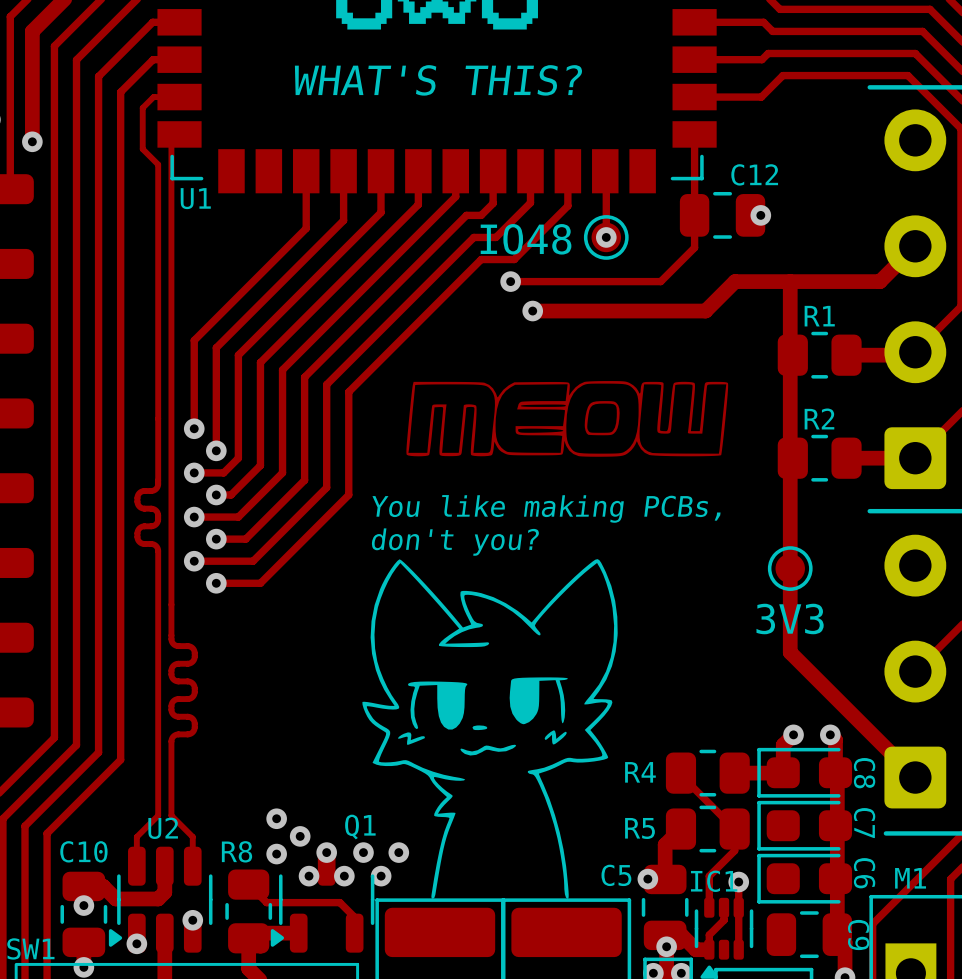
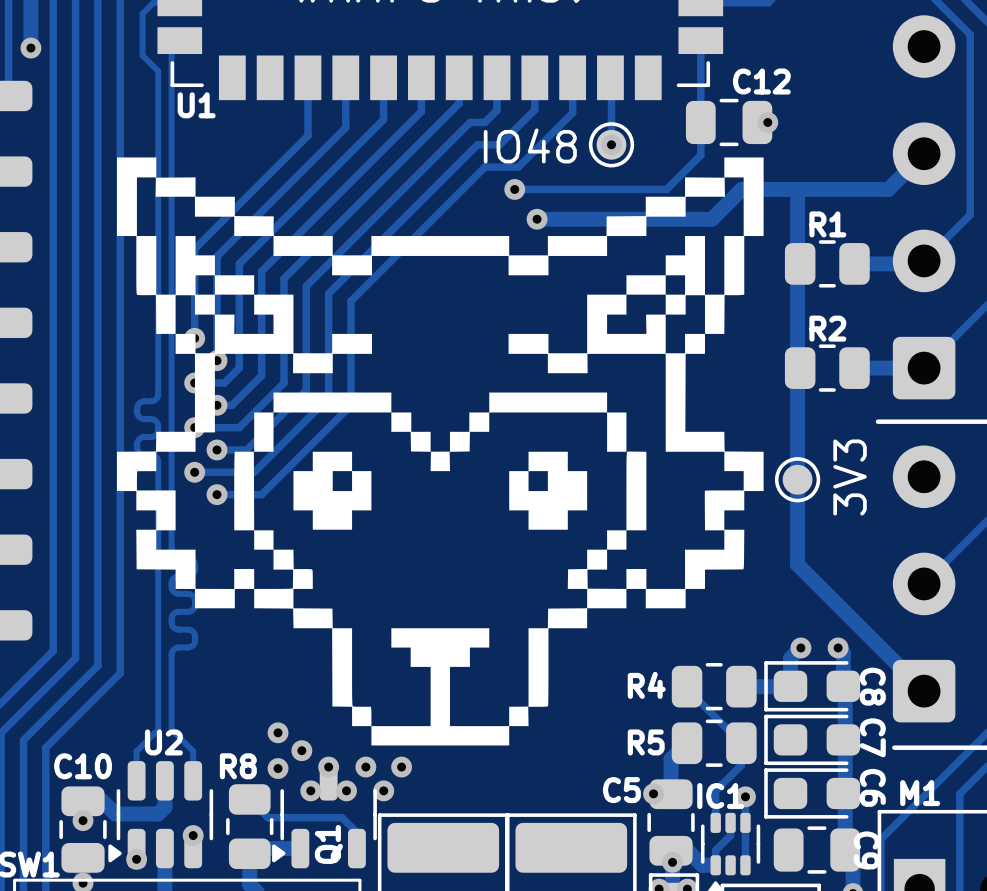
drawing: none -> [116, 157, 764, 746]
drawing: [406, 381, 729, 457] -> none
text: You like making PCBs, (546, 508) -> none
text: don't you? (455, 542) -> none
drawing: [362, 559, 618, 899] -> none
text rotation: 0° (790, 618) -> 90° counterclockwise (850, 477)
Q1 name rotation: 0° (360, 827) -> 90° counterclockwise (328, 844)
Q1 name position: Q1 (360, 827) -> Q1 (328, 844)

